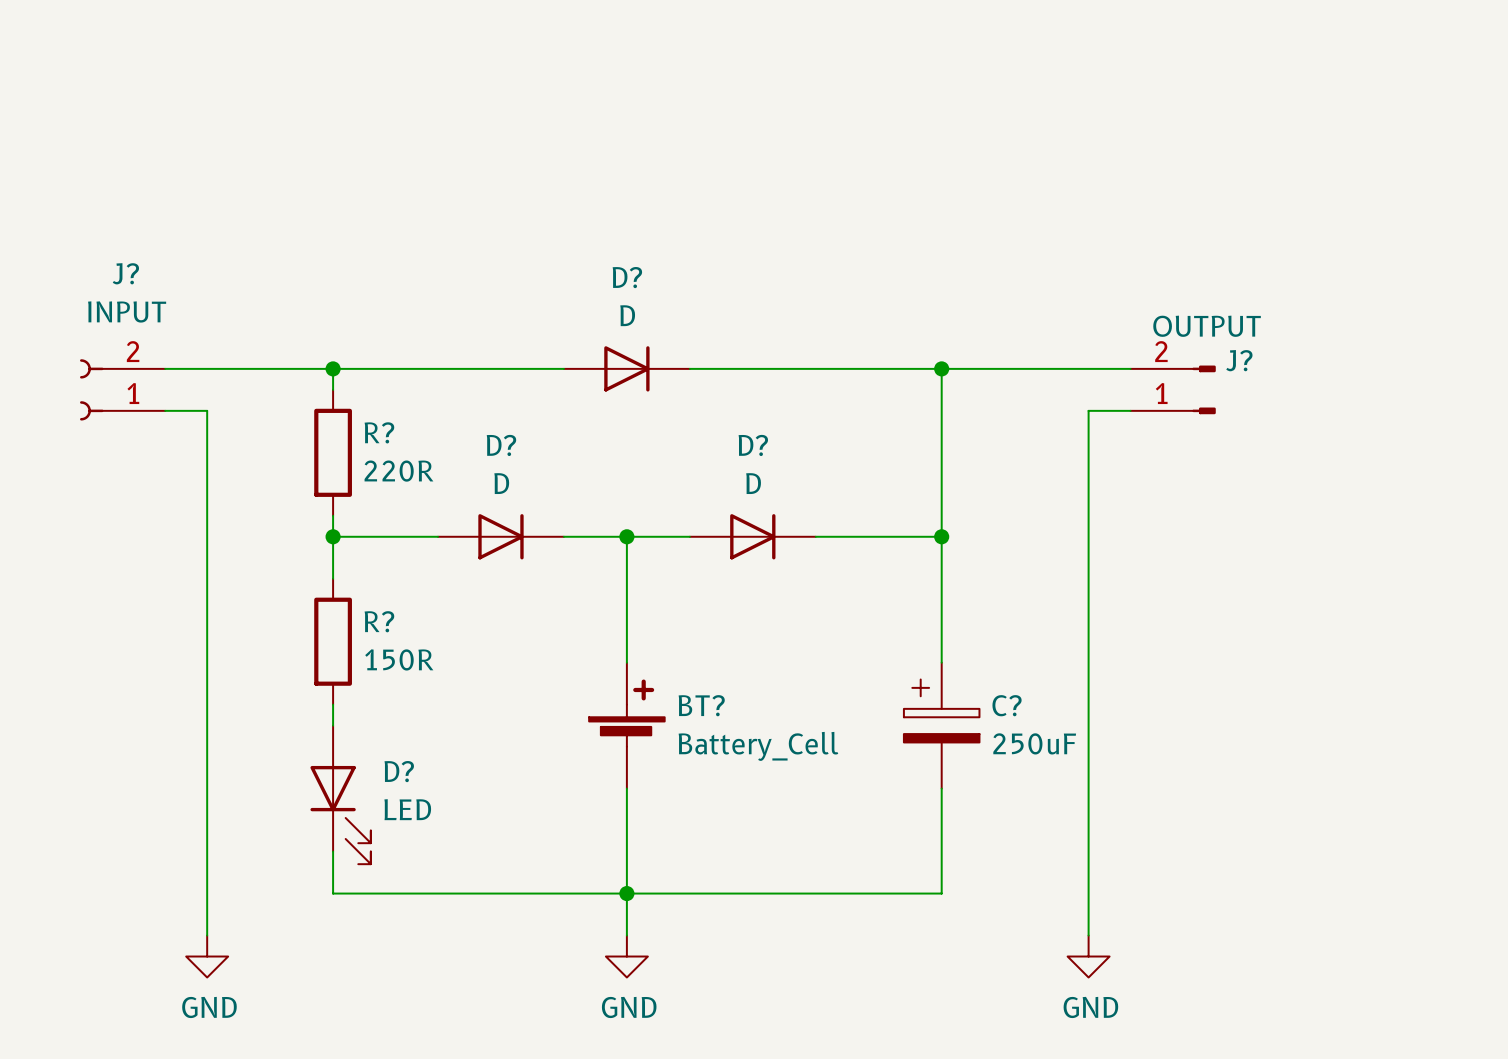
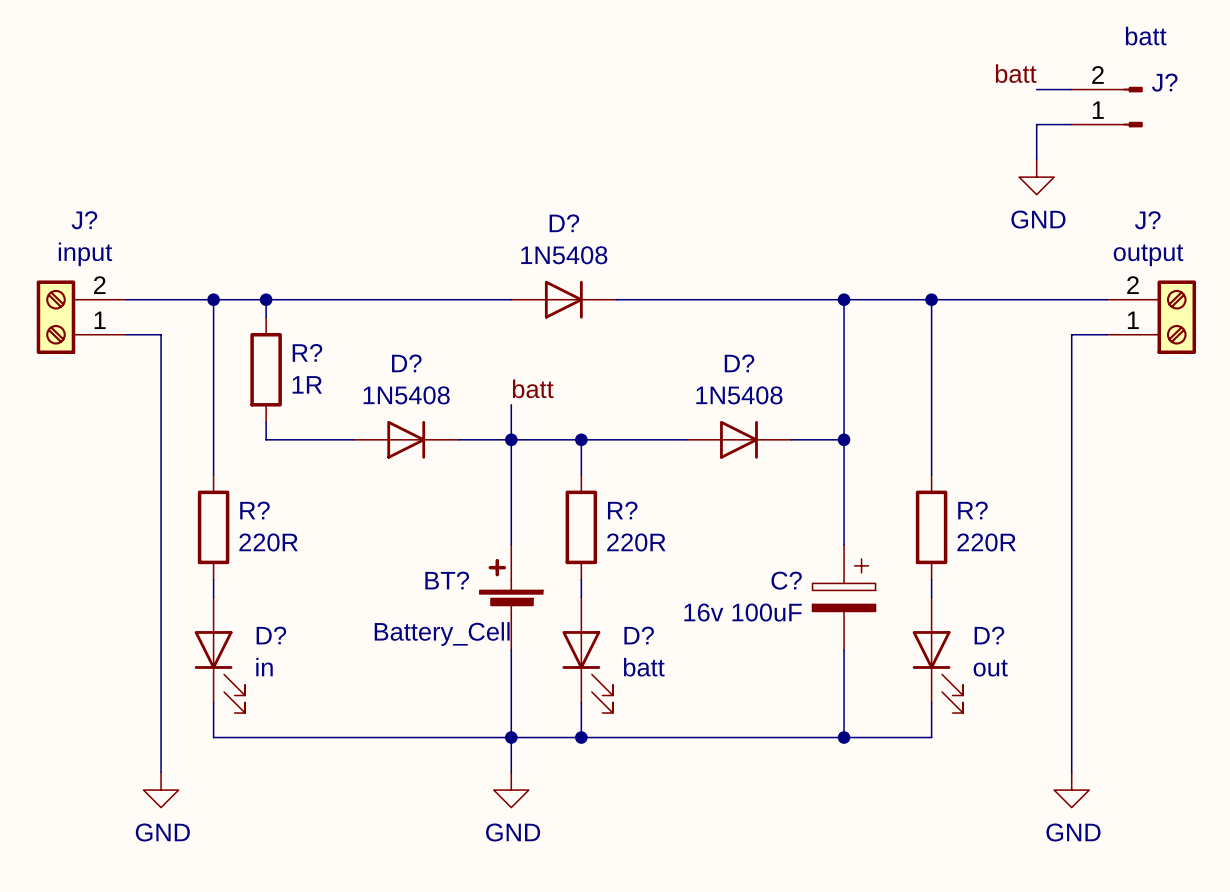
label: none -> batt (1016, 73)
wire: none -> (1036, 89) (1071, 89)
J?: none -> batt (1107, 107)
wire: none -> (1071, 124) (1036, 124) (1036, 159)
power symbol: none -> GND (1036, 177)
J? value: INPUT (127, 311) -> input (85, 254)
J? symbol: [80, 359, 166, 421] -> [36, 280, 127, 355]
wire: none -> (213, 299) (213, 474)
junction: none -> (213, 299)
D?: D (626, 368) -> none
D?: none -> 1N5408 (563, 299)
wire: (941, 368) (941, 662) -> (844, 299) (844, 544)
junction position: (941, 368) -> (844, 299)
junction: none -> (931, 299)
wire: none -> (1106, 299) (931, 299) (931, 474)
J?: OUTPUT (1173, 389) -> none
J?: none -> output (1151, 317)
wire: (1130, 410) (1088, 410) (1088, 935) -> (1106, 334) (1071, 334) (1071, 772)
R? value: 220R (398, 471) -> 1R (307, 384)
label: none -> batt (533, 388)
D? value: D (501, 483) -> 1N5408 (406, 395)
wire: none -> (511, 404) (511, 439)
wire: (333, 536) (333, 578) -> (581, 439) (581, 474)
junction: (333, 536) -> none
junction: none -> (581, 439)
D?: D (752, 536) -> none
D?: none -> 1N5408 (738, 439)
junction position: (941, 536) -> (844, 439)
wire: none -> (791, 439) (844, 439)
R?: none -> 220R (213, 527)
R?: 150R (333, 641) -> none
R?: none -> 220R (581, 527)
R?: none -> 220R (931, 527)
wire: none -> (213, 579) (213, 597)
wire: (333, 704) (333, 725) -> (581, 579) (581, 597)
wire: none -> (931, 579) (931, 597)
BT? flip: as is (626, 713) -> left-right (511, 586)
C?: 250uF (941, 725) -> none
C?: none -> 16v 100uF (844, 597)
BT? value position: Battery_Cell (758, 746) -> Battery_Cell (442, 633)
wire: (941, 788) (941, 893) -> (931, 702) (931, 737) (773, 737)
wire: none -> (844, 649) (844, 737)
D?: none -> in (219, 655)
D?: LED (340, 794) -> none
D?: none -> batt (587, 655)
D?: none -> out (937, 655)
wire: (333, 851) (333, 893) -> (213, 702) (213, 737) (266, 737)
wire: none -> (581, 702) (581, 737)
junction: none -> (581, 737)
junction: none -> (844, 737)
power symbol position: GND (1088, 956) -> GND (1071, 790)

